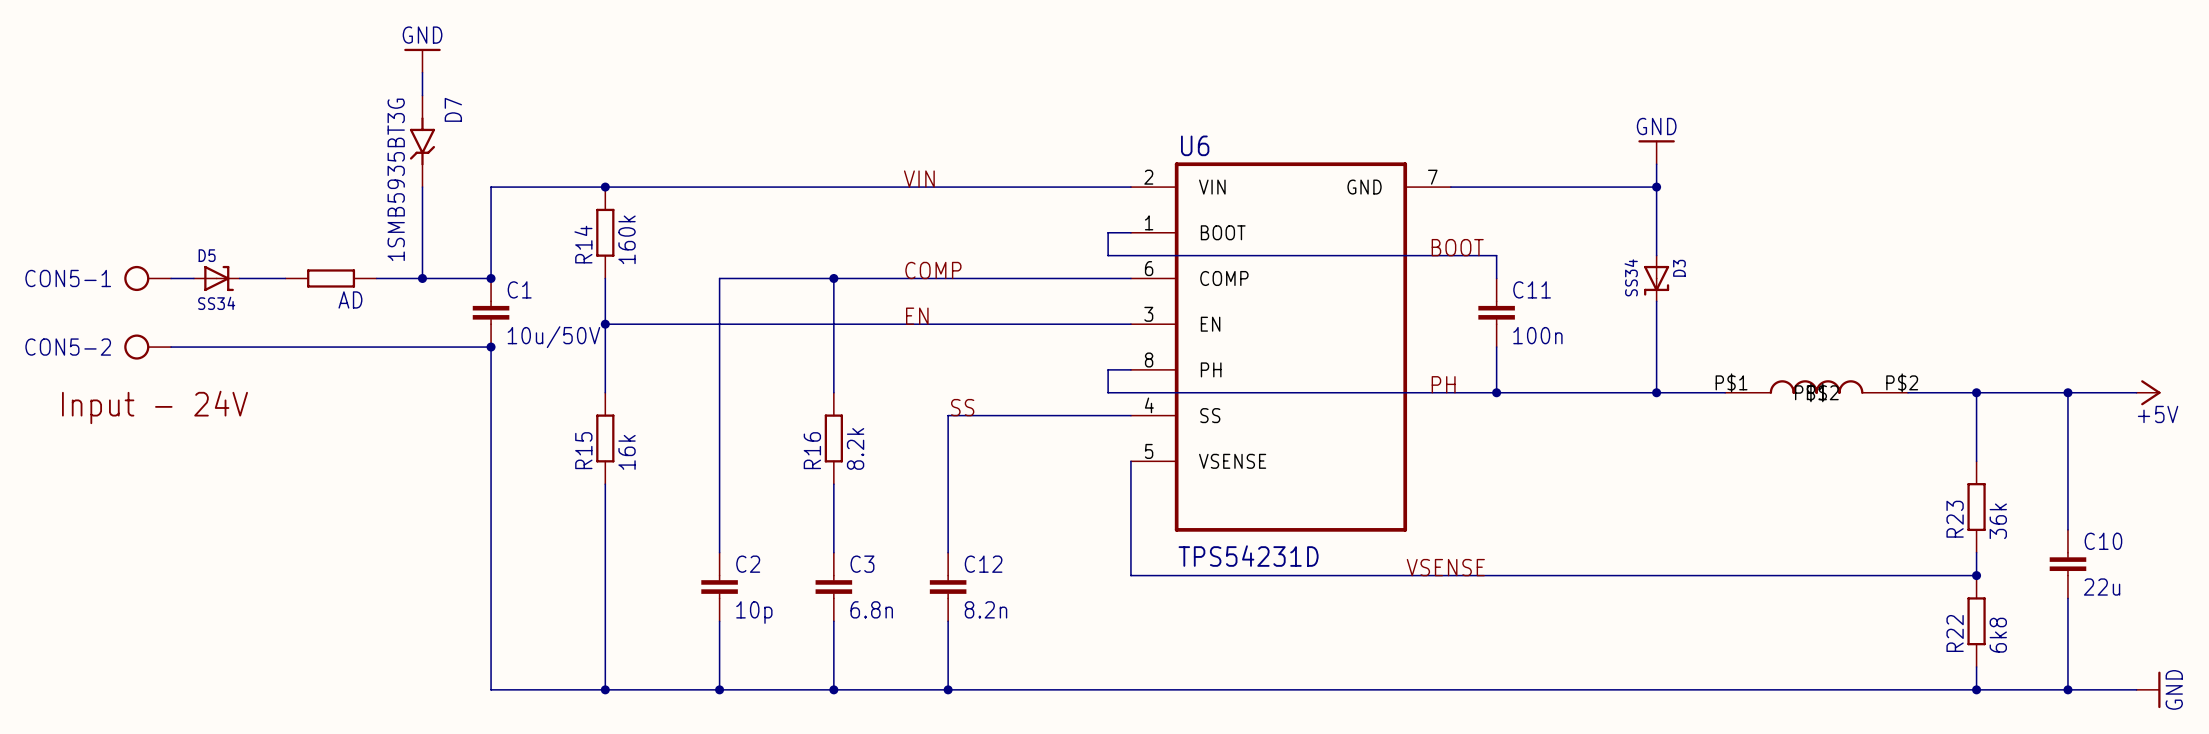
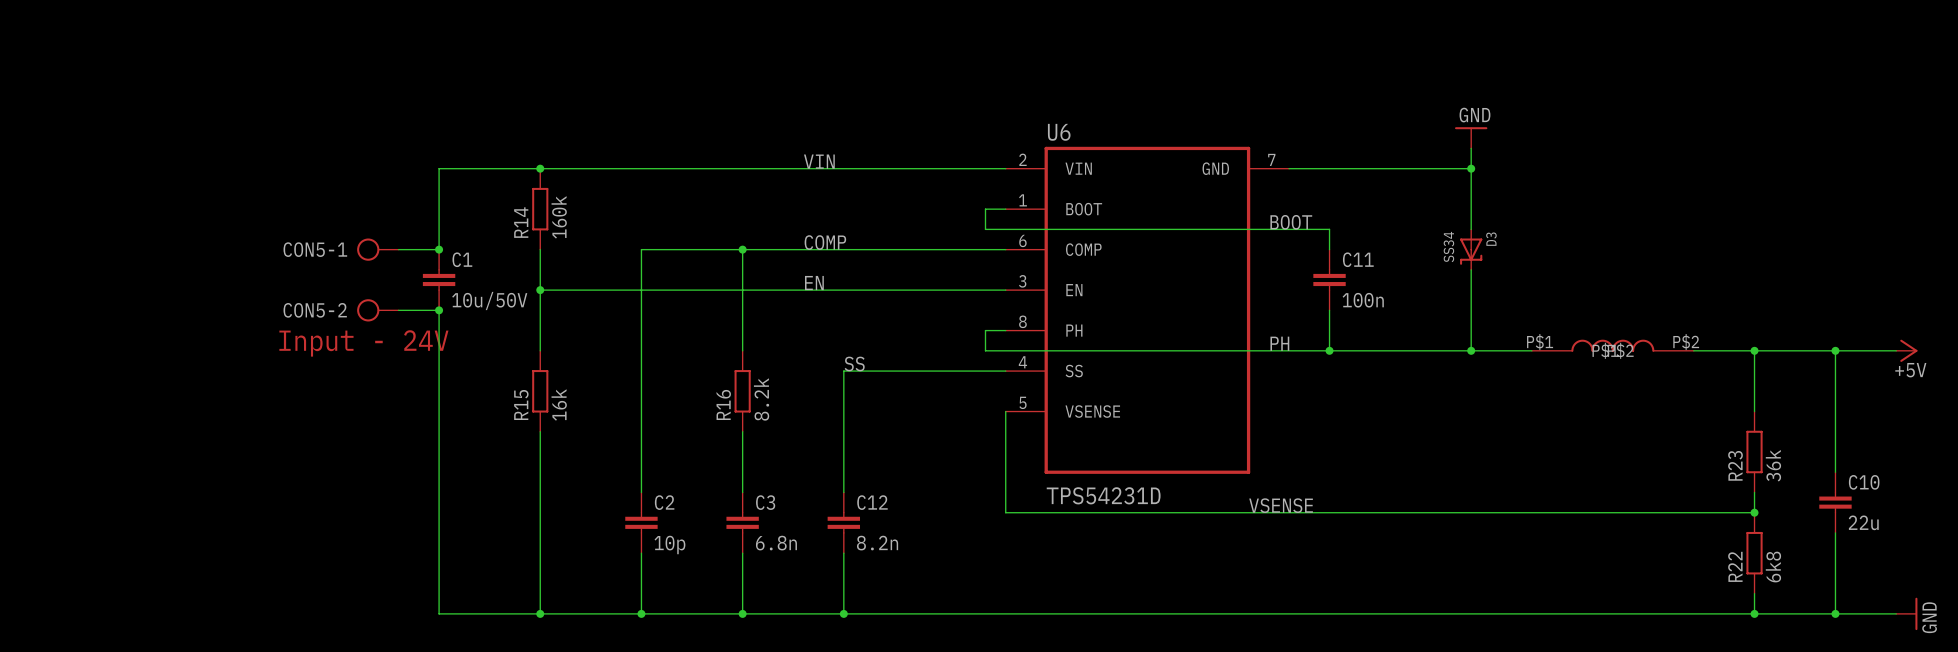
power symbol: GND (422, 60) -> none
wire: (422, 72) (422, 95) -> none
D7: 1SMB5935BT3G (422, 141) -> none
wire: (422, 187) (422, 278) -> none
CON5-1 position: (147, 278) -> (377, 249)
wire: (171, 278) (193, 278) -> none
D5: SS34 (216, 278) -> none
wire: (239, 278) (285, 278) -> none
AD: (331, 278) -> none
wire: (376, 278) (445, 278) -> none
junction: (422, 278) -> none
CON5-2 position: (147, 347) -> (377, 310)
wire: (171, 347) (445, 347) -> none
text: none -> Input - 24V (363, 343)
text: Input - 24V (154, 407) -> none

